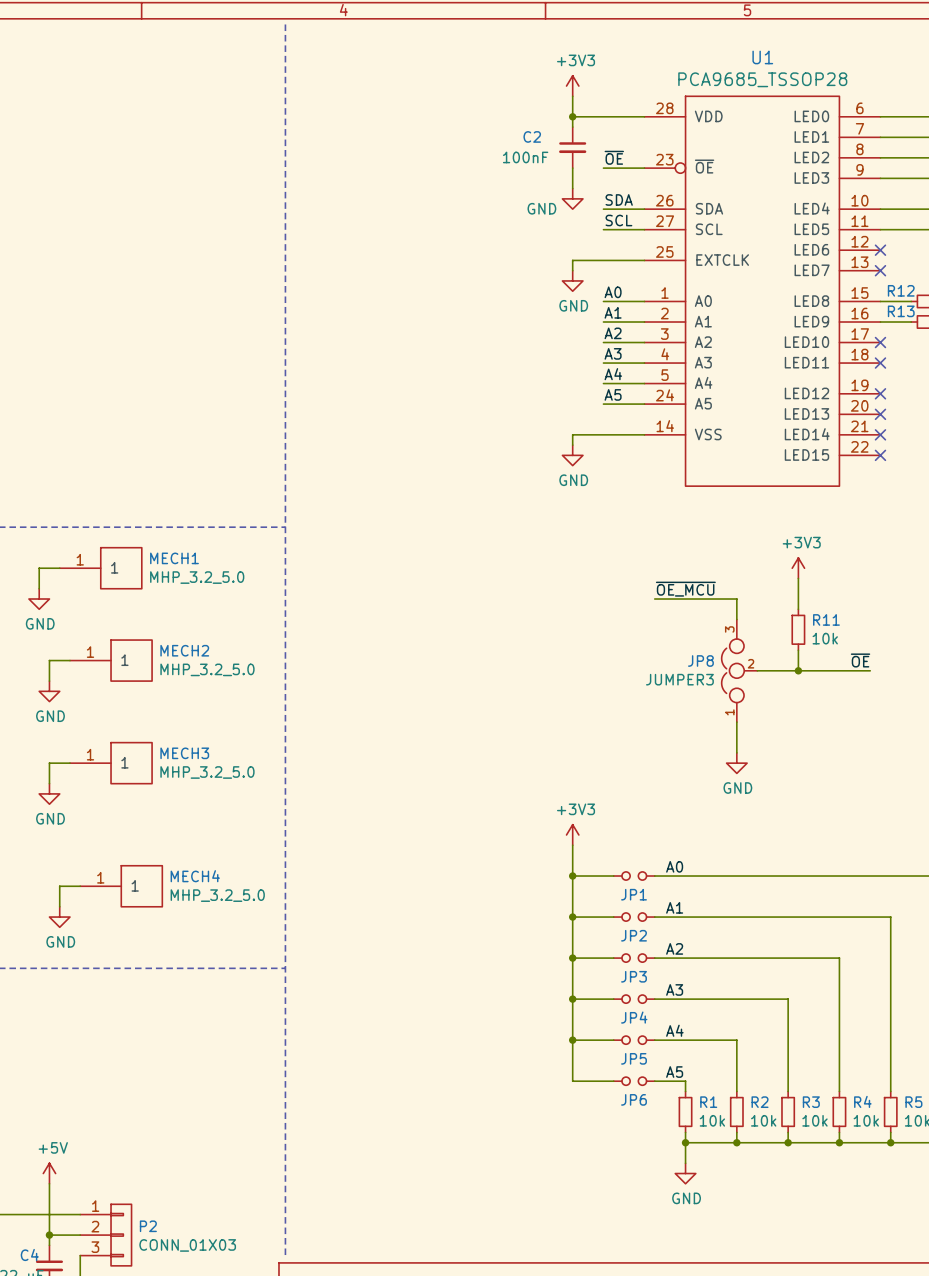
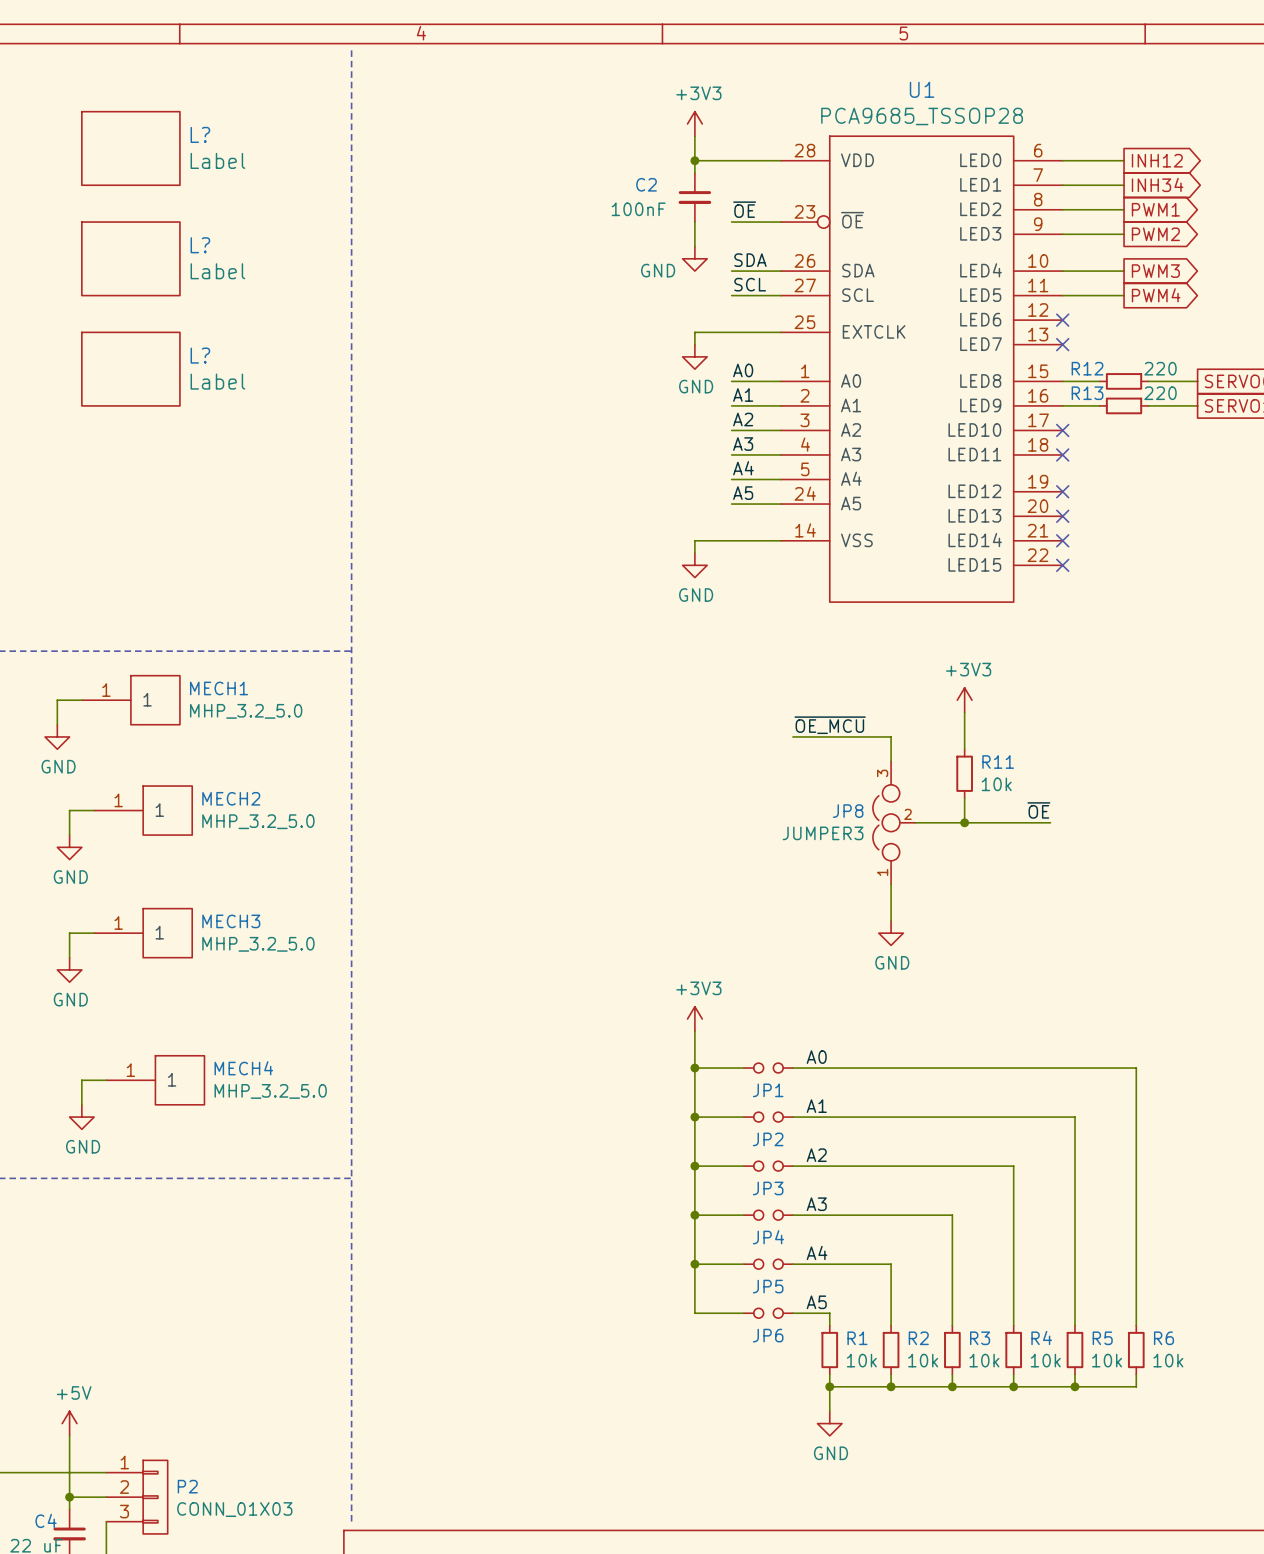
L?: none -> Label (130, 148)
L?: none -> Label (130, 258)
L?: none -> Label (130, 369)

